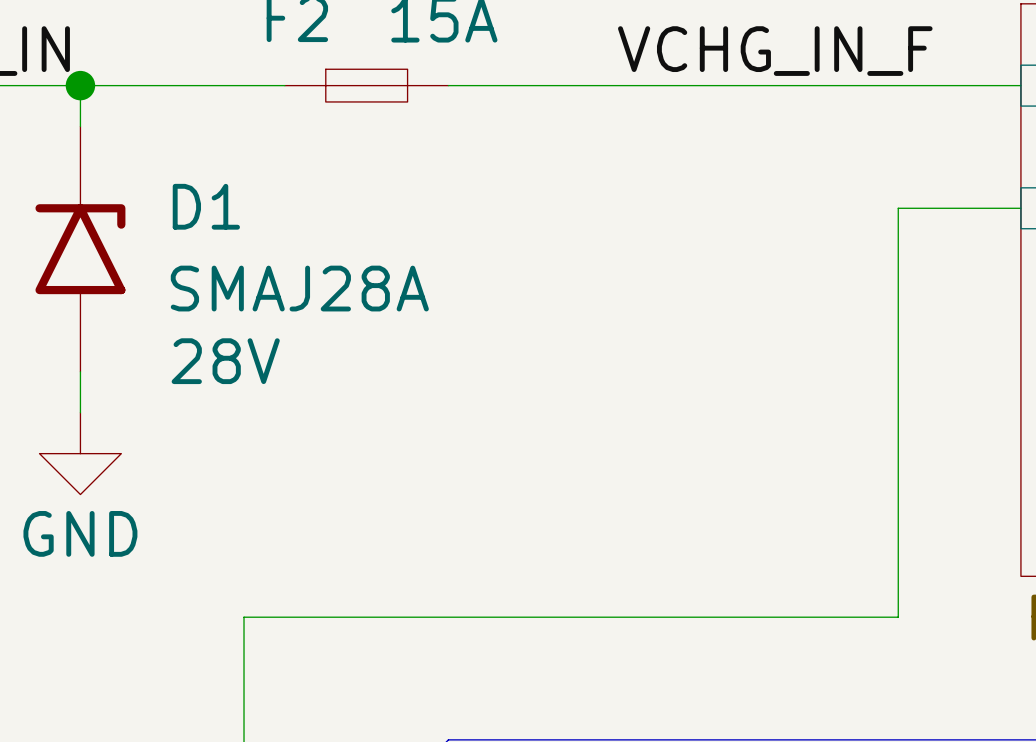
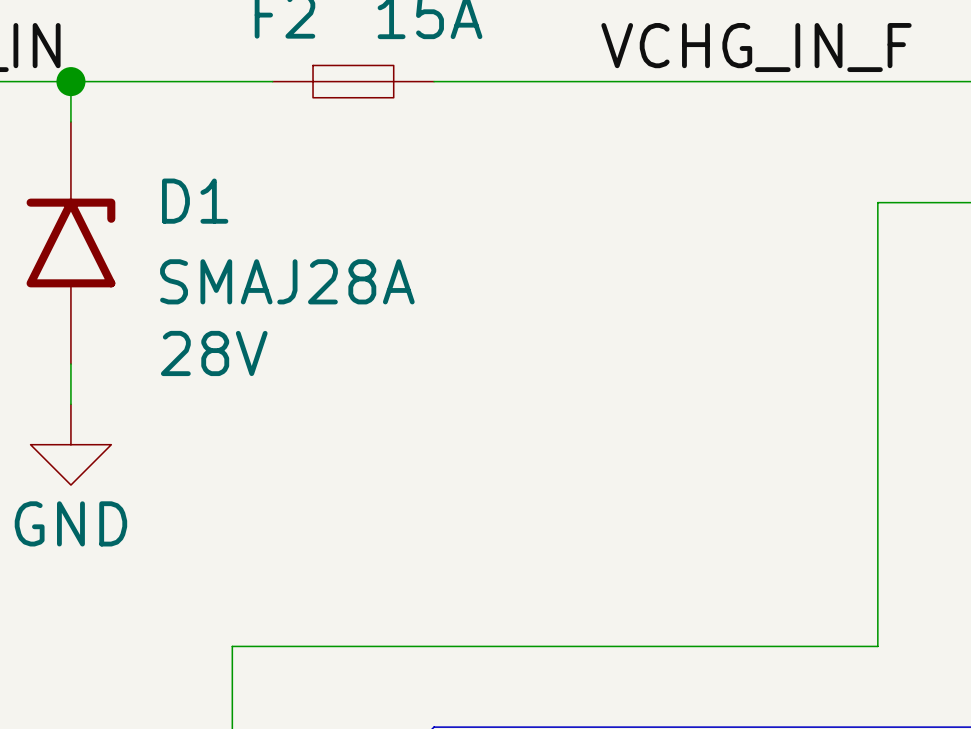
wire: (898, 617) (244, 617) (244, 658) -> (877, 606) (877, 646) (232, 646)

